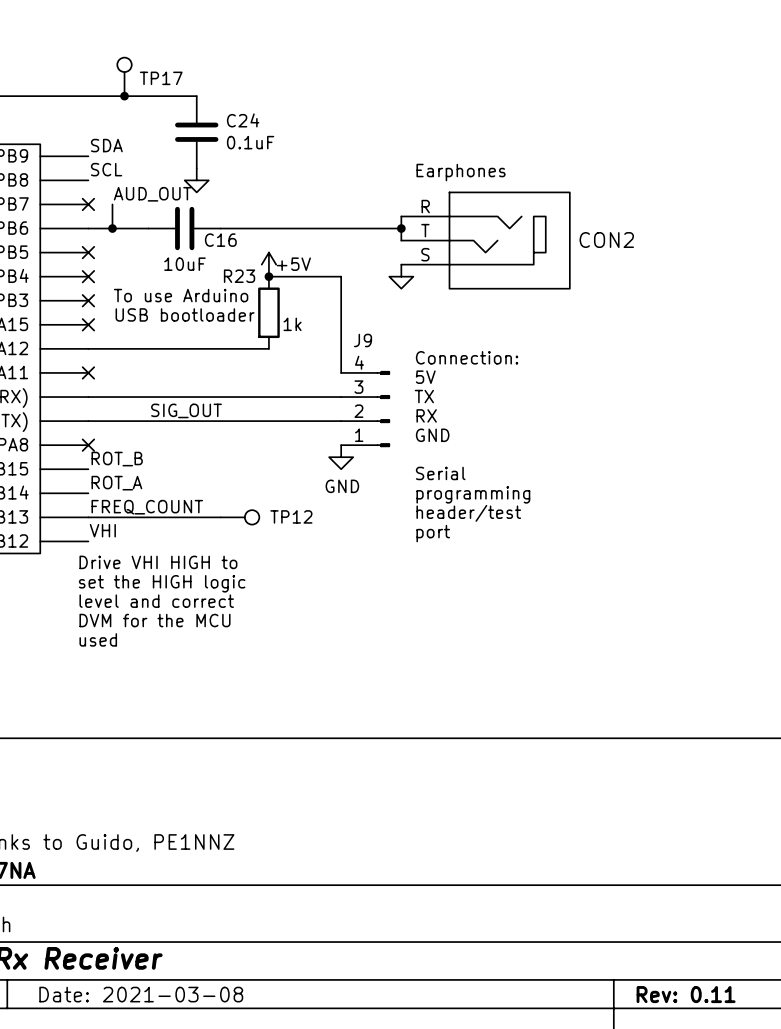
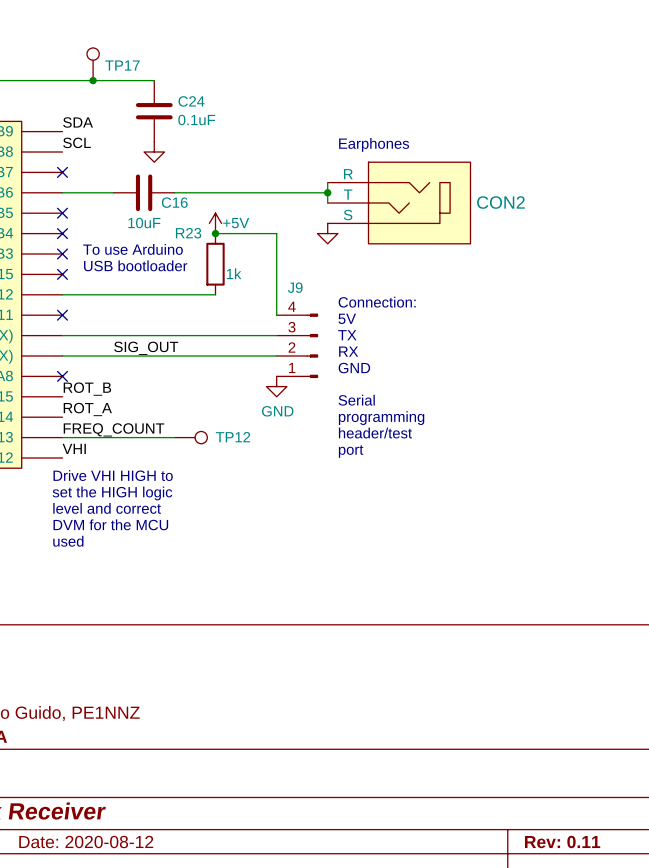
label: AUD_OUT (152, 194) -> none
wire: (112, 204) (112, 228) -> none
junction: (112, 228) -> none
title block: Date: 2021-03-08 (141, 994) -> Date: 2020-08-12 (86, 842)

